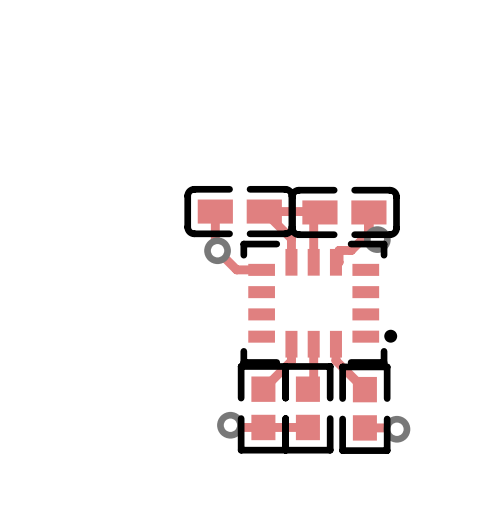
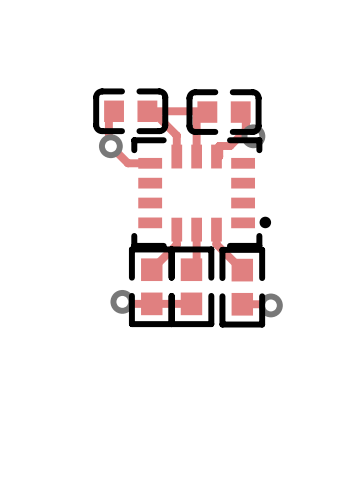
part footprint: [184, 185, 296, 238] -> [93, 88, 169, 135]
part footprint: [288, 186, 400, 239] -> [186, 89, 262, 135]

